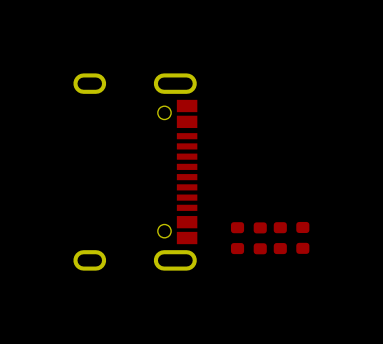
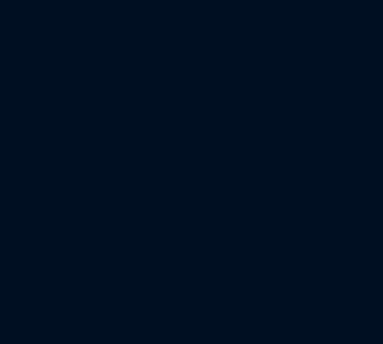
part: (135, 172) -> none
part: (302, 237) -> none
part: (237, 238) -> none
part: (260, 238) -> none
part: (280, 238) -> none

